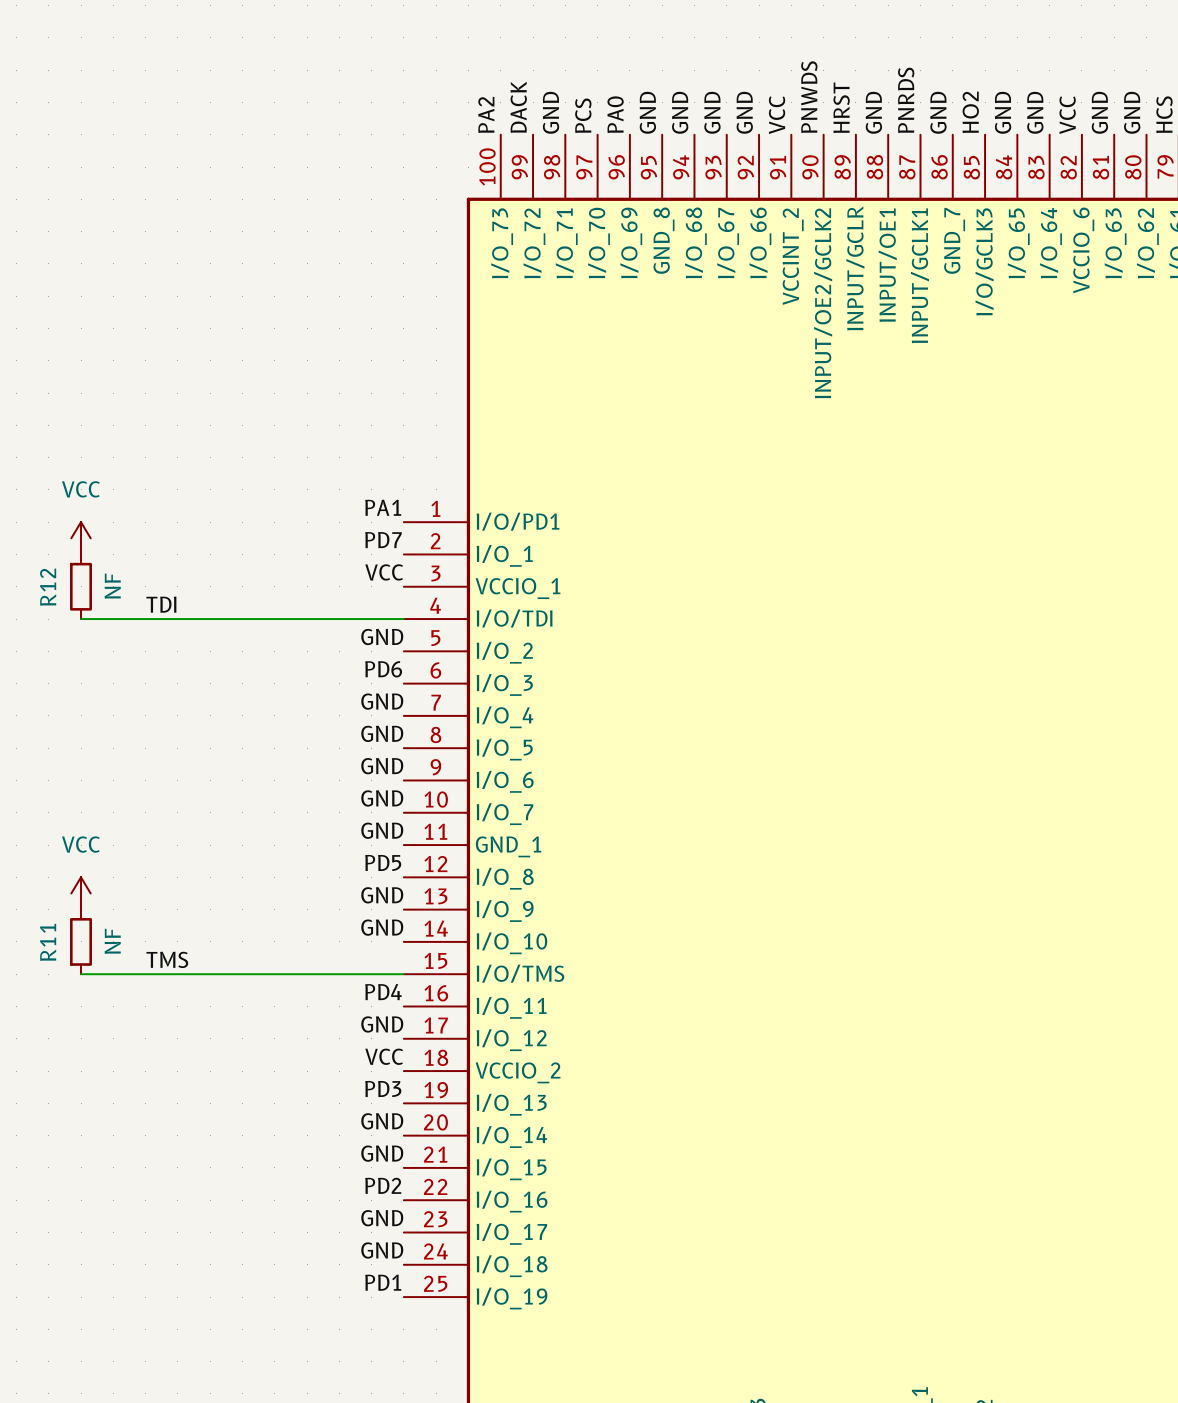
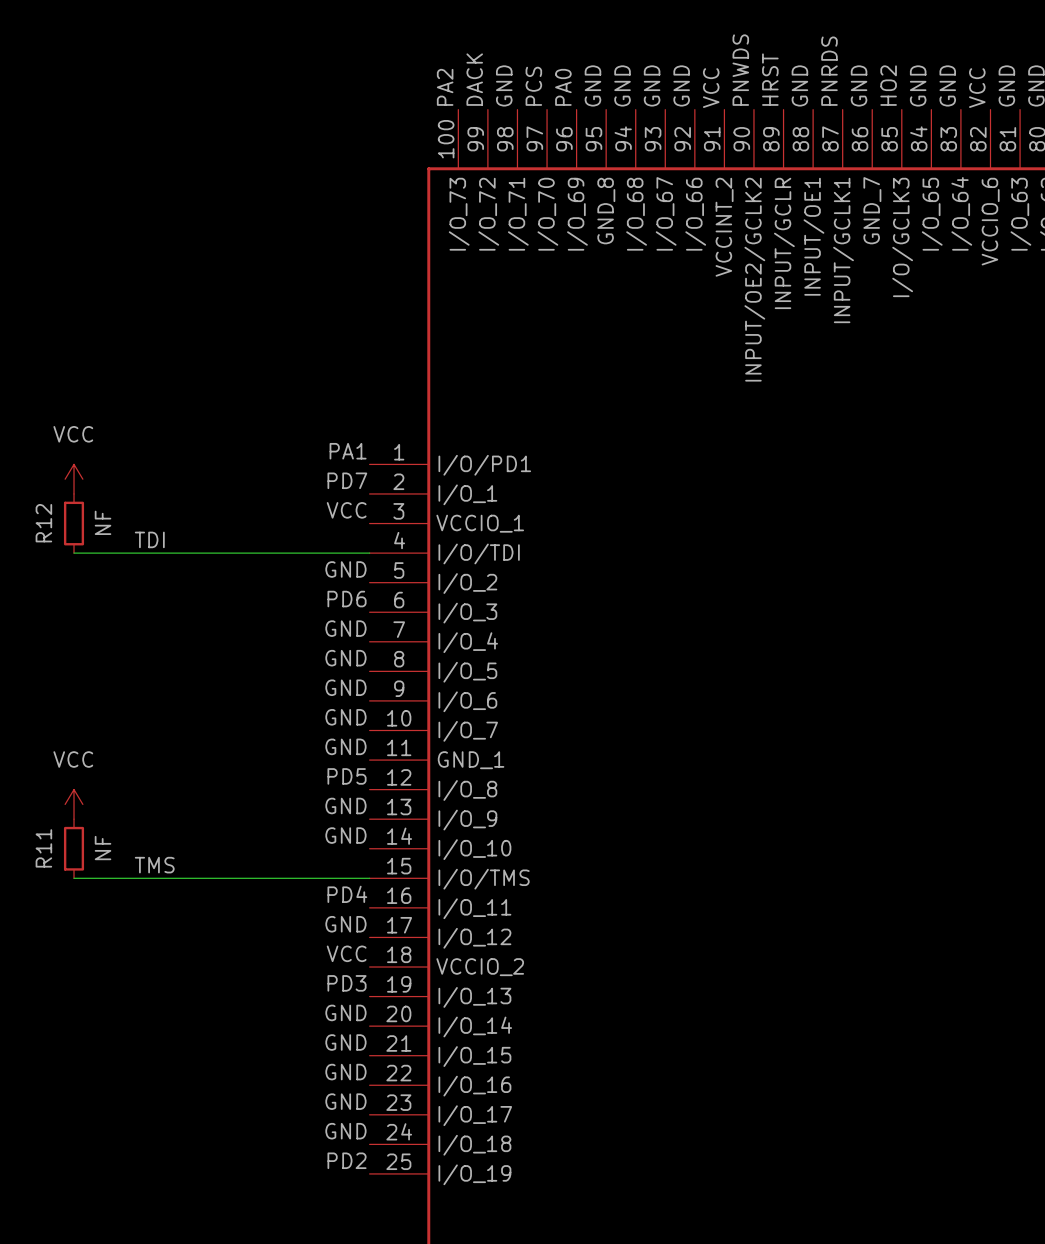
label: PD2 (383, 1185) -> GND (345, 1072)
label: PD1 (383, 1282) -> PD2 (347, 1160)

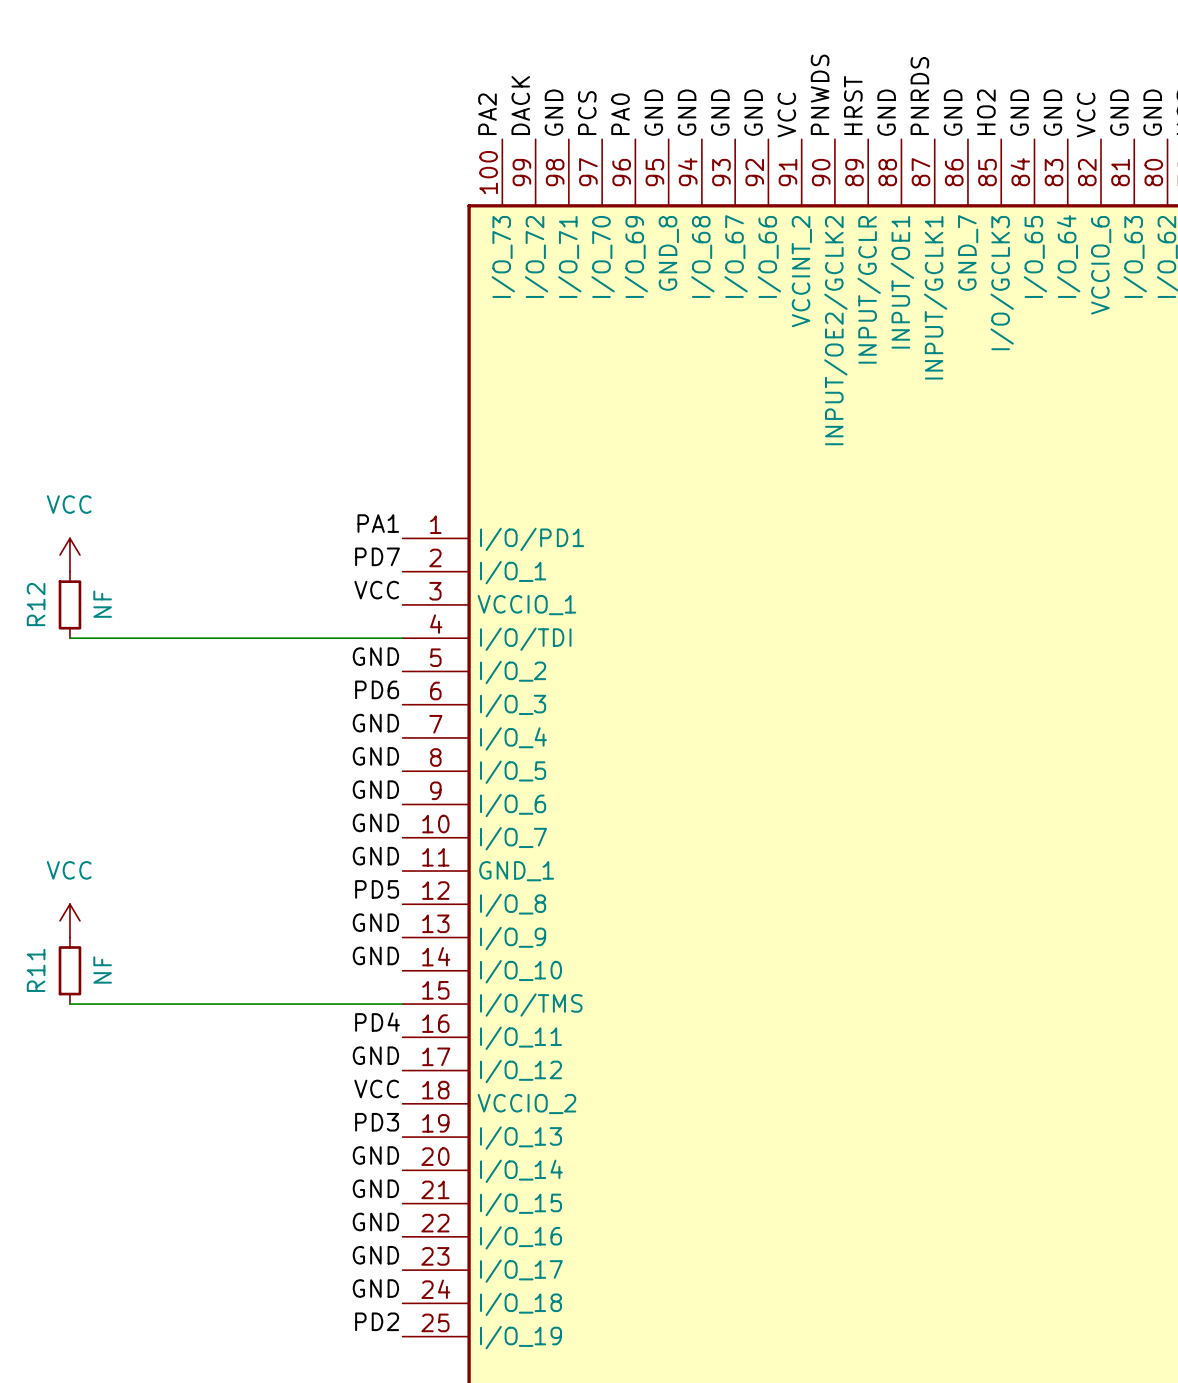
label: TDI (149, 539) -> none
label: TMS (154, 865) -> none

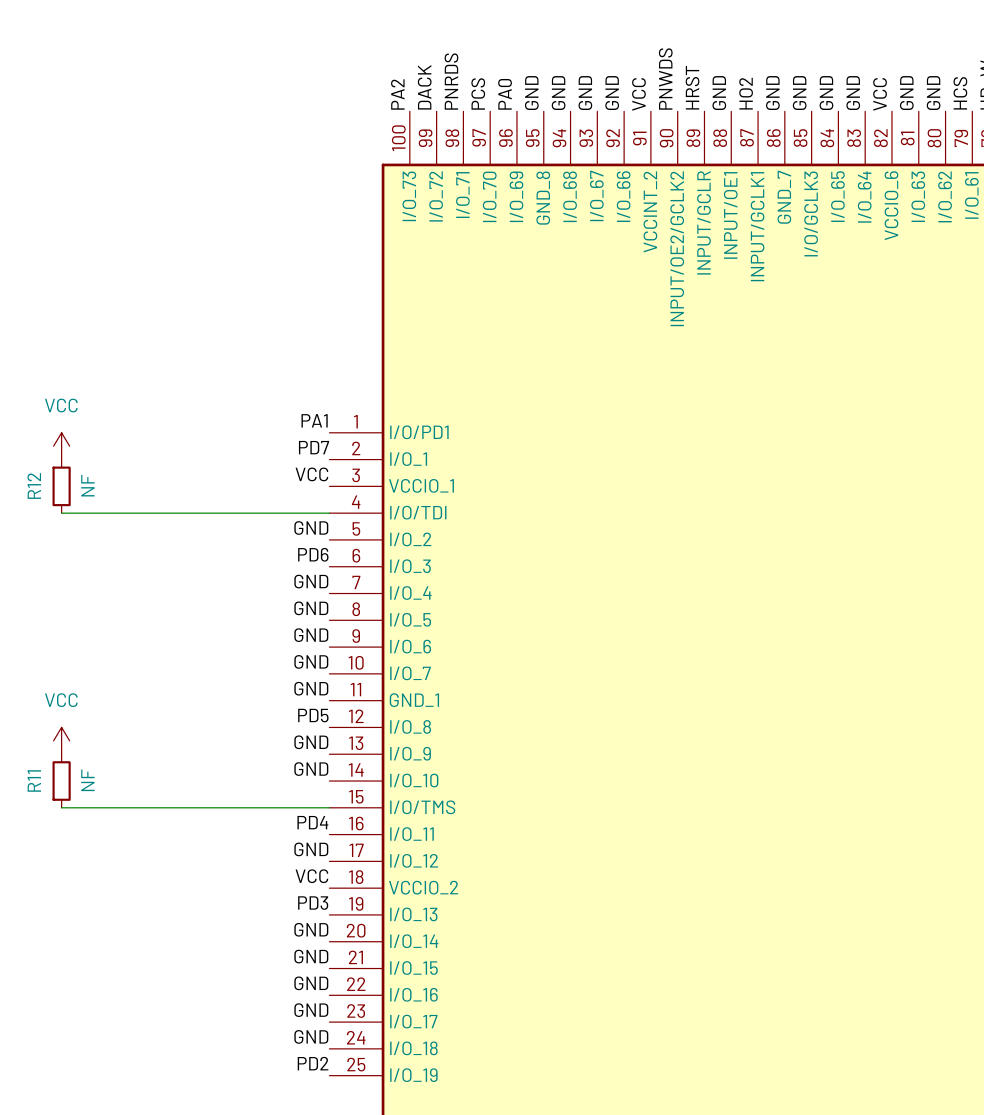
label: PNRDS (919, 96) -> HO2 (746, 93)
label: GND (554, 112) -> PNRDS (451, 81)
label: HO2 (986, 112) -> GND (799, 93)

